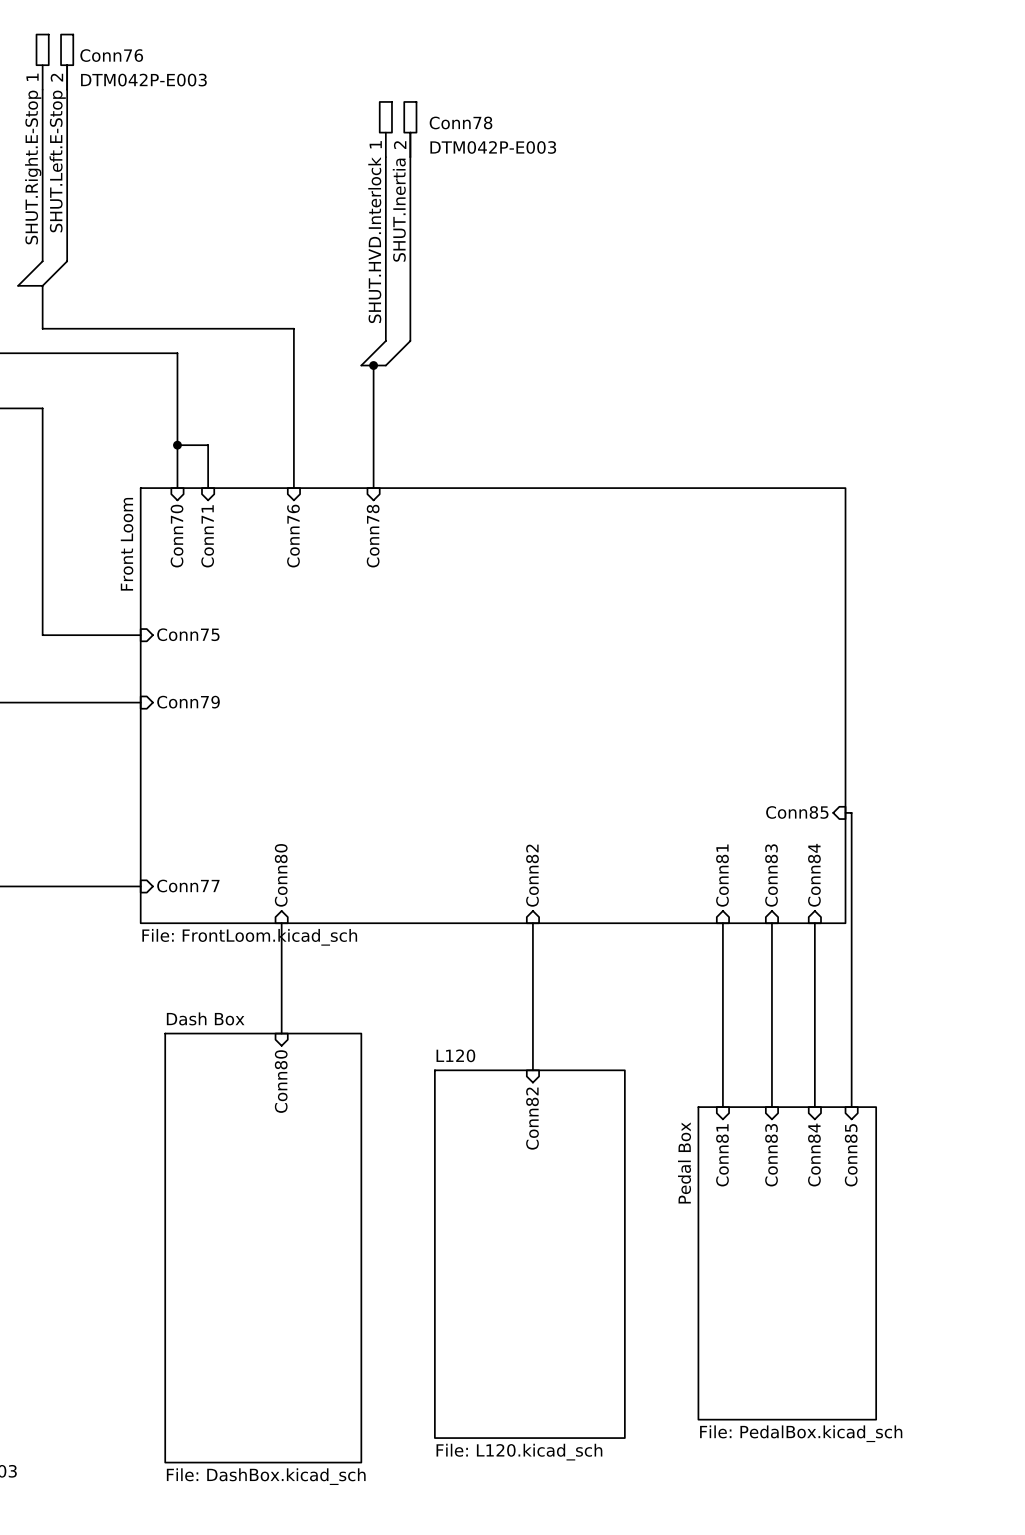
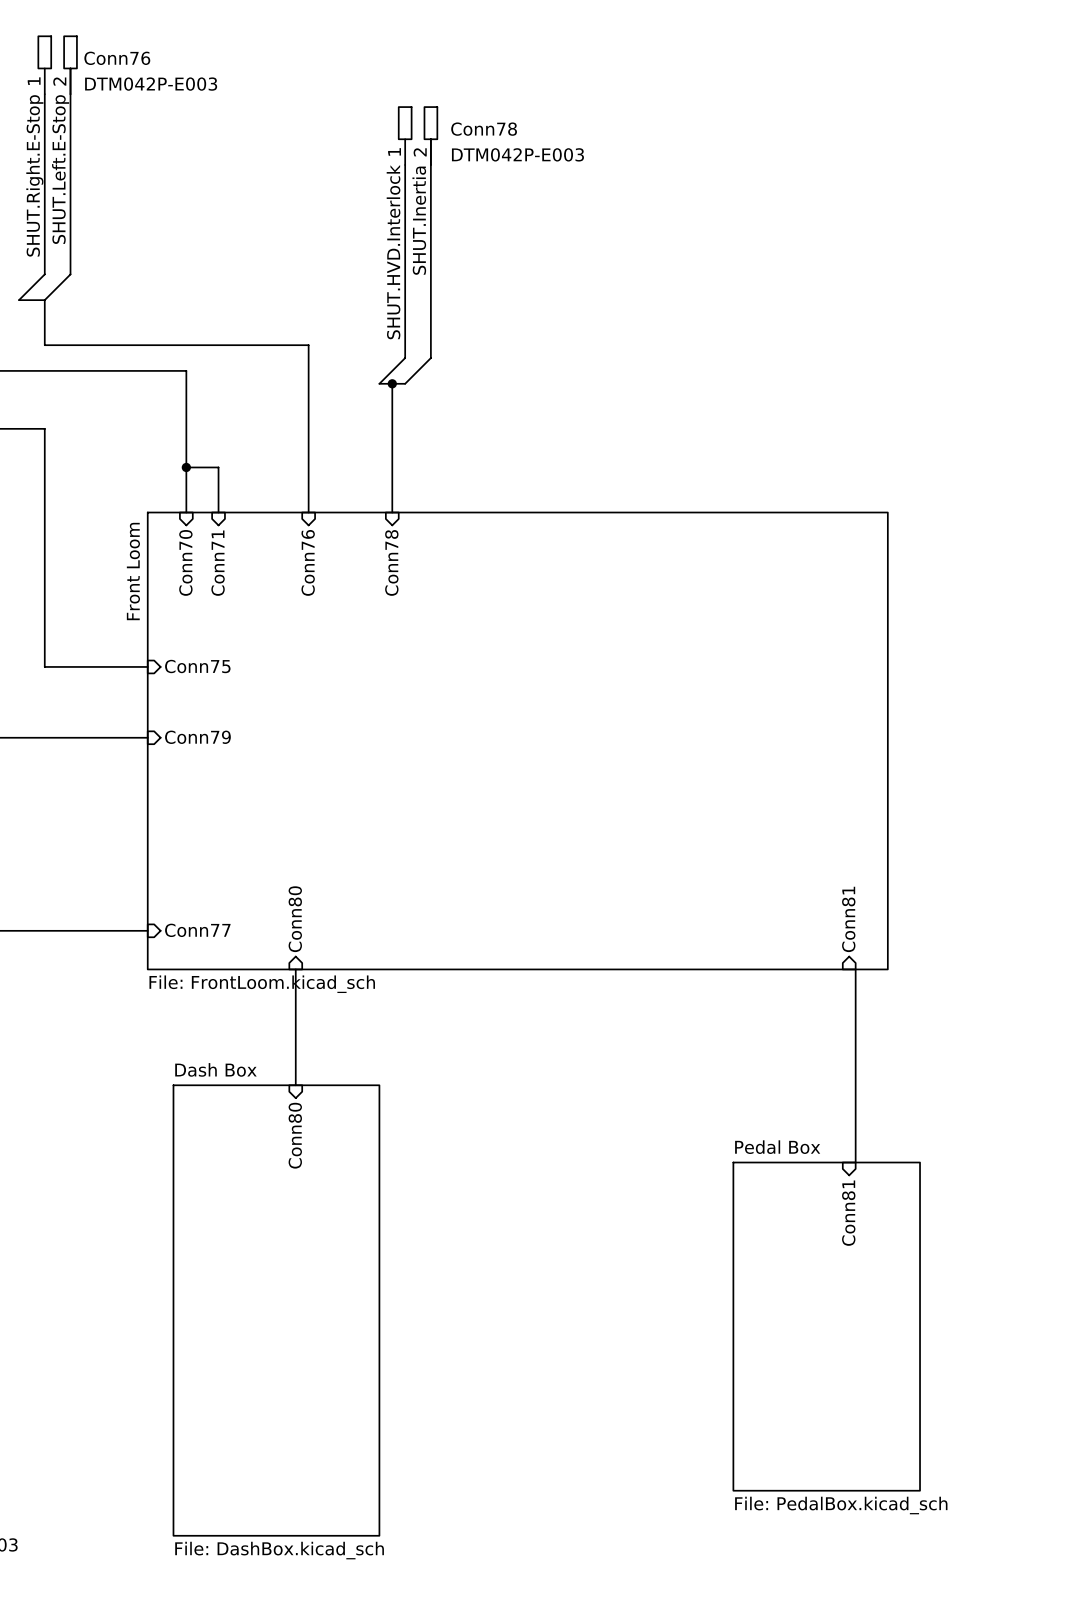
sheet pin: Conn85 (797, 812) -> none
bus: (845, 812) (851, 812) (851, 1107) -> none
sheet pin: Conn82 (532, 875) -> none
sheet pin position: Conn81 (722, 875) -> Conn81 (848, 919)
sheet pin: Conn83 (771, 875) -> none
sheet pin: Conn84 (814, 875) -> none
bus: (532, 923) (532, 1070) -> none
bus: (722, 923) (722, 1107) -> none
bus: (771, 923) (771, 1107) -> none
sheet pin: Conn82 (532, 1118) -> none
sheet pin position: Conn81 (722, 1155) -> Conn81 (848, 1213)
sheet pin: Conn83 (771, 1155) -> none
sheet pin: Conn84 (814, 1155) -> none
sheet pin: Conn85 (851, 1155) -> none
sheet Pedal Box name rotation: 0° (684, 1162) -> 90° clockwise (777, 1147)
sheet L120: File: L120.kicad_sch (529, 1254) -> none

